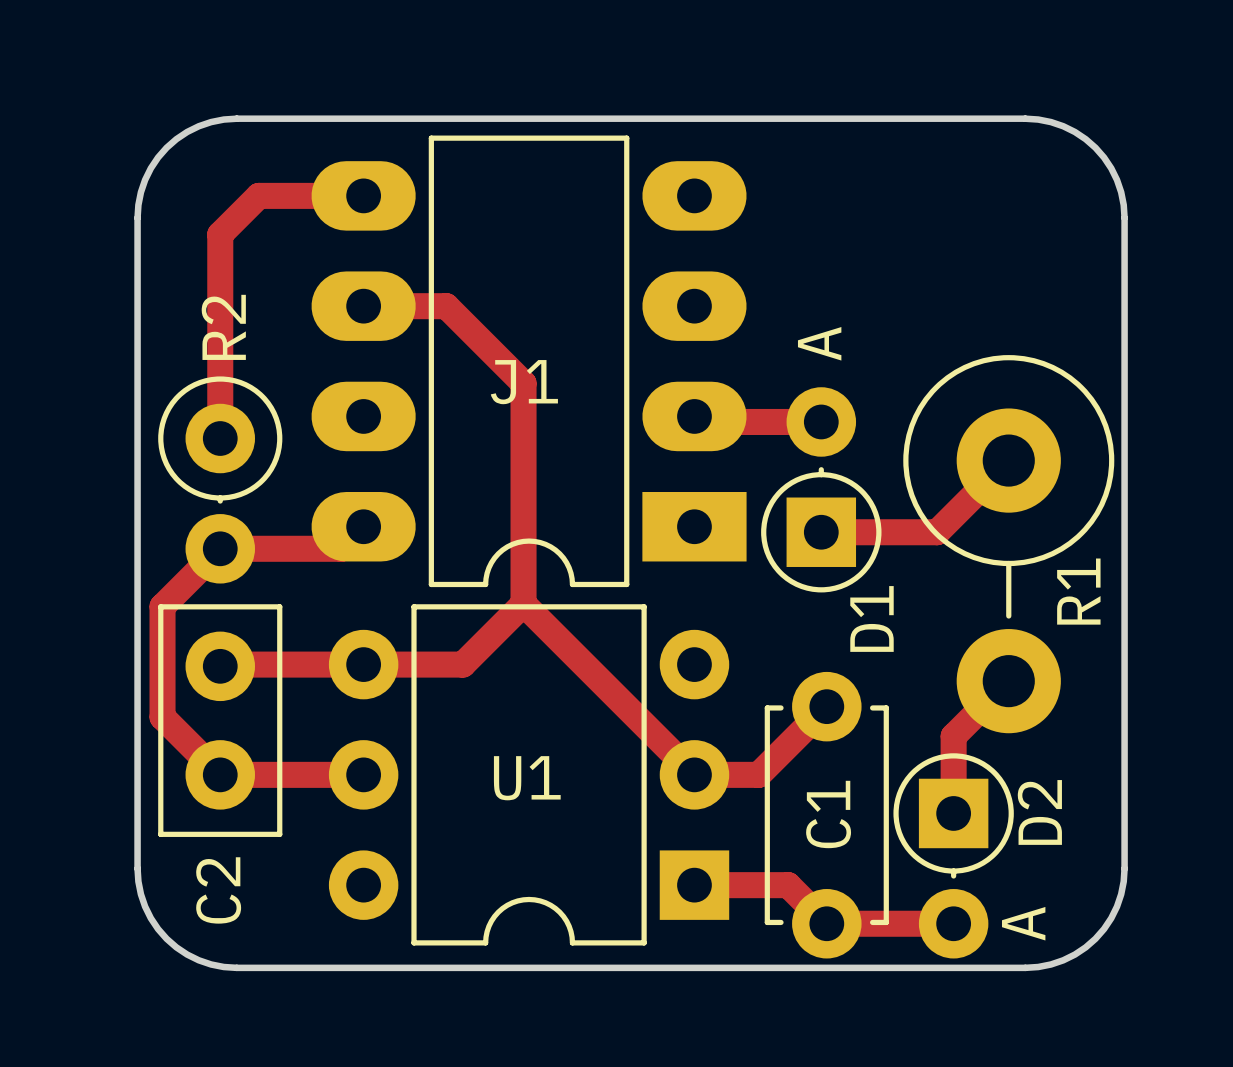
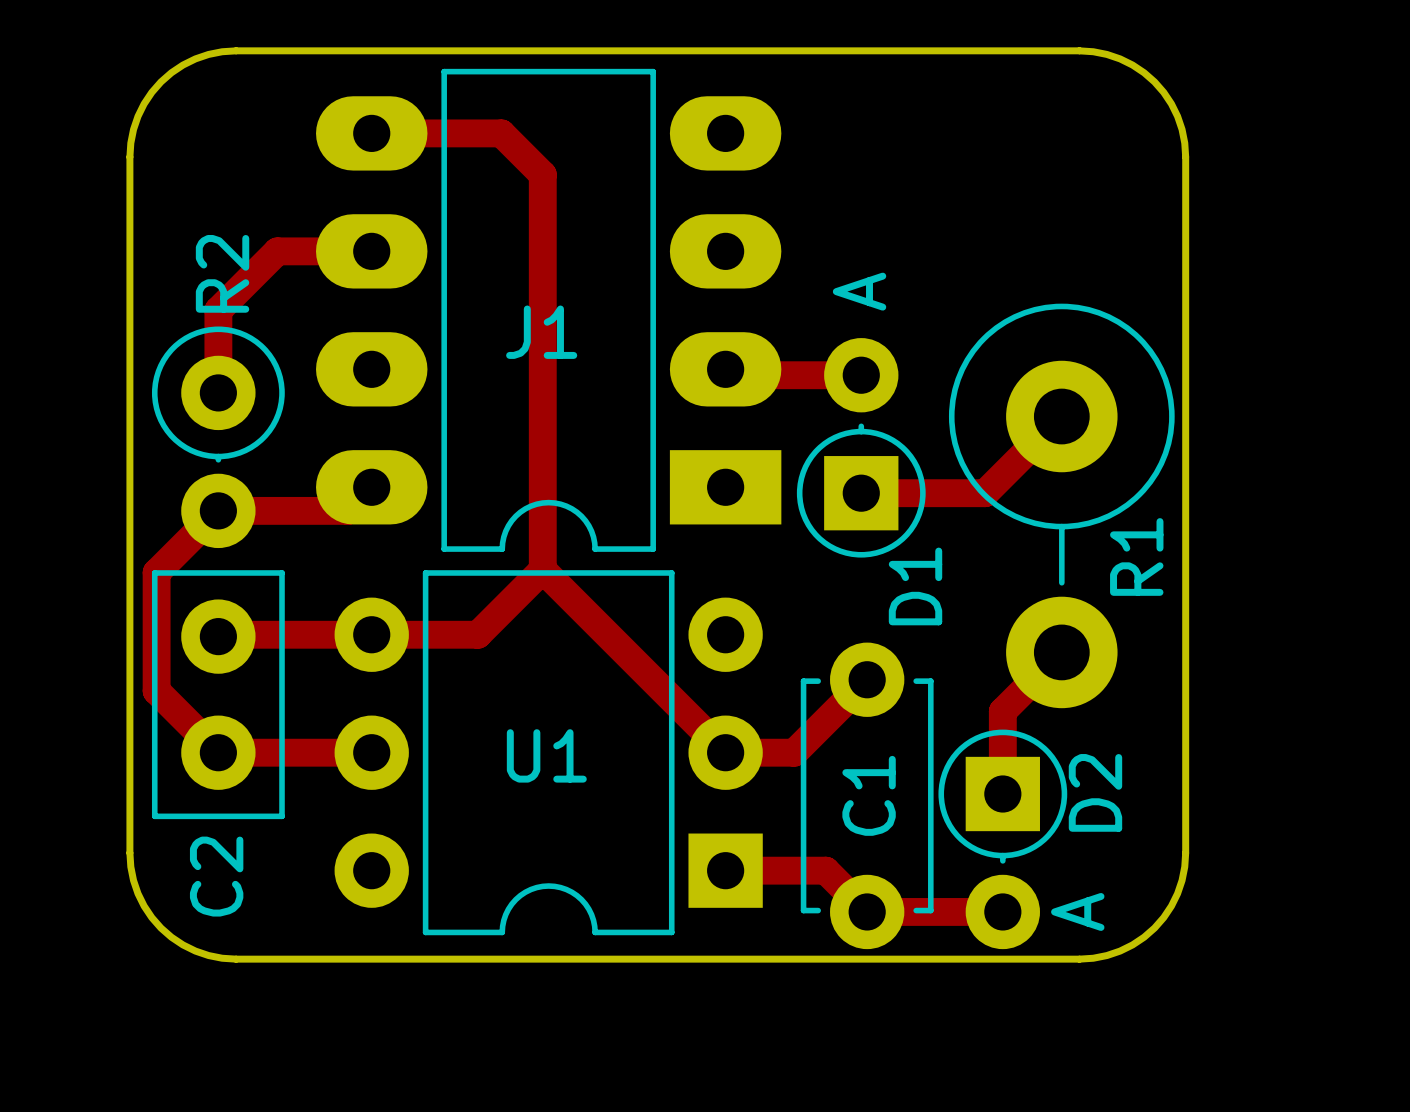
track: (363, 195) (258, 195) (220, 234) (220, 361) -> (371, 251) (277, 251) (218, 310)
track: (363, 306) (446, 306) (523, 383) -> (371, 133) (501, 133) (542, 174) (542, 333)

